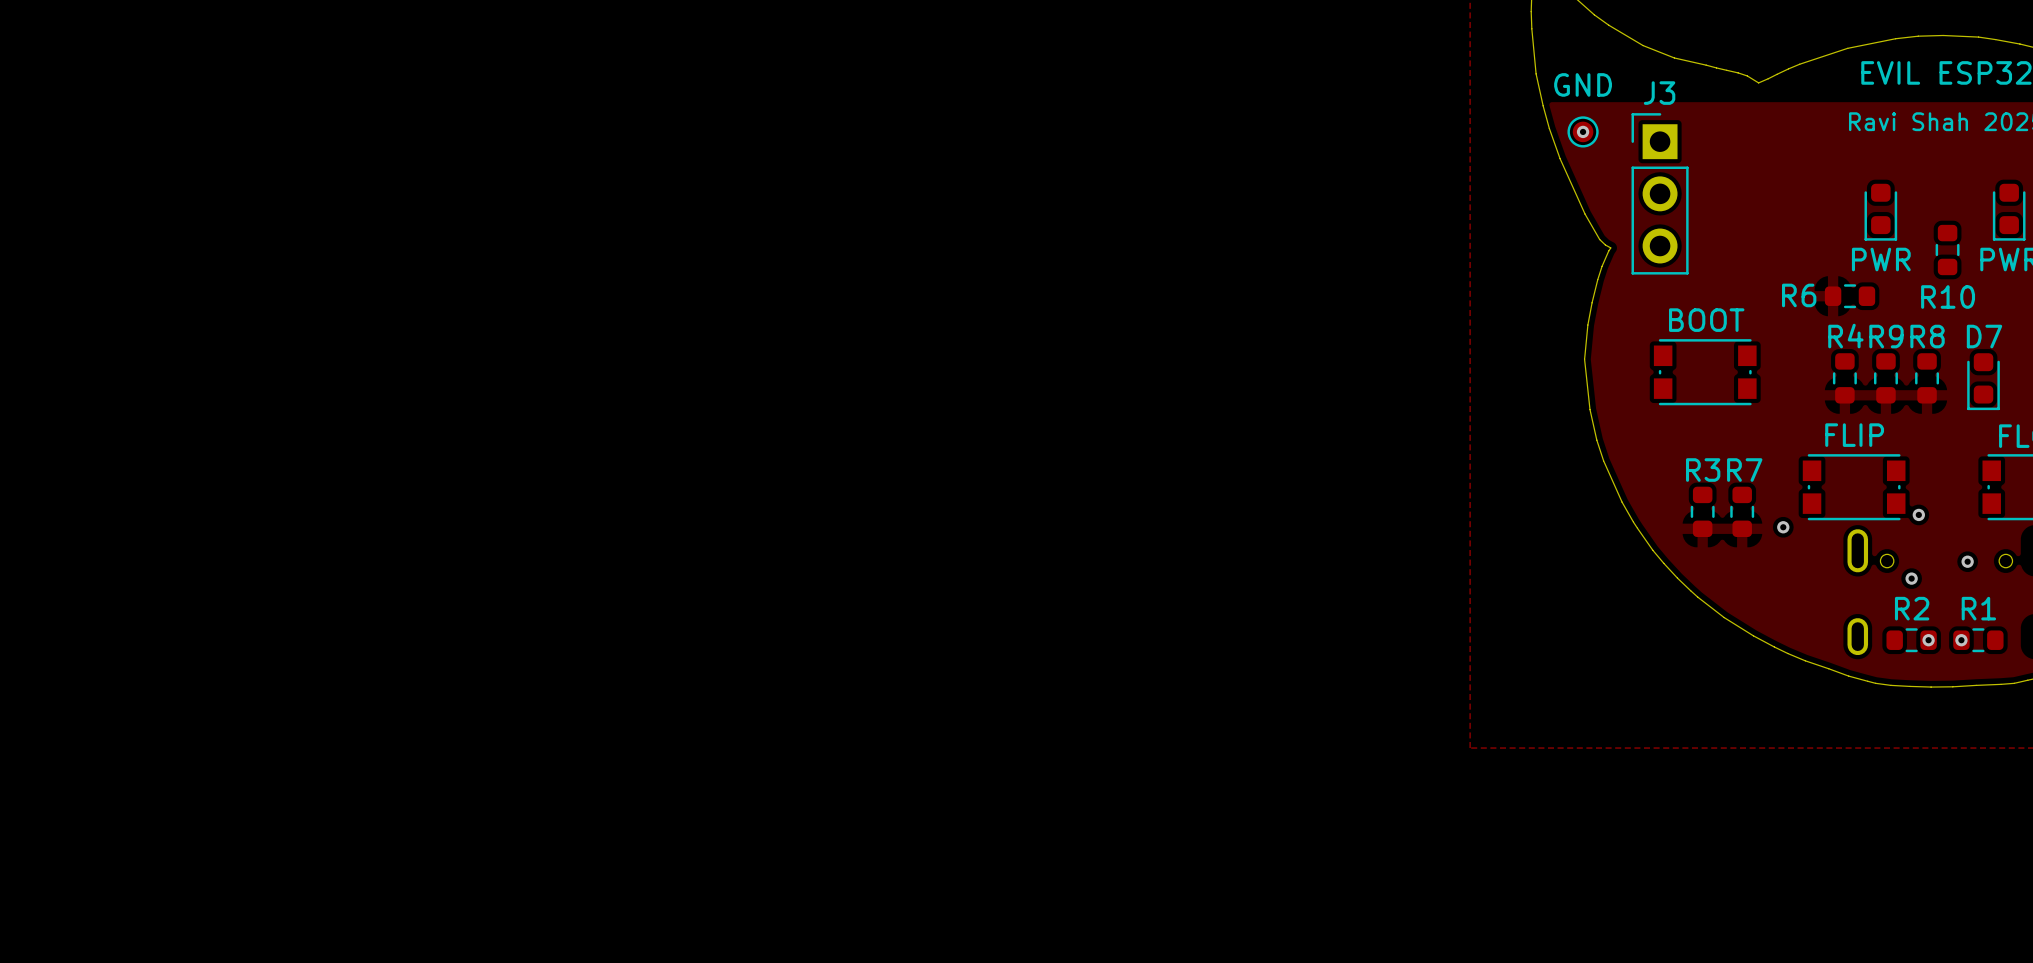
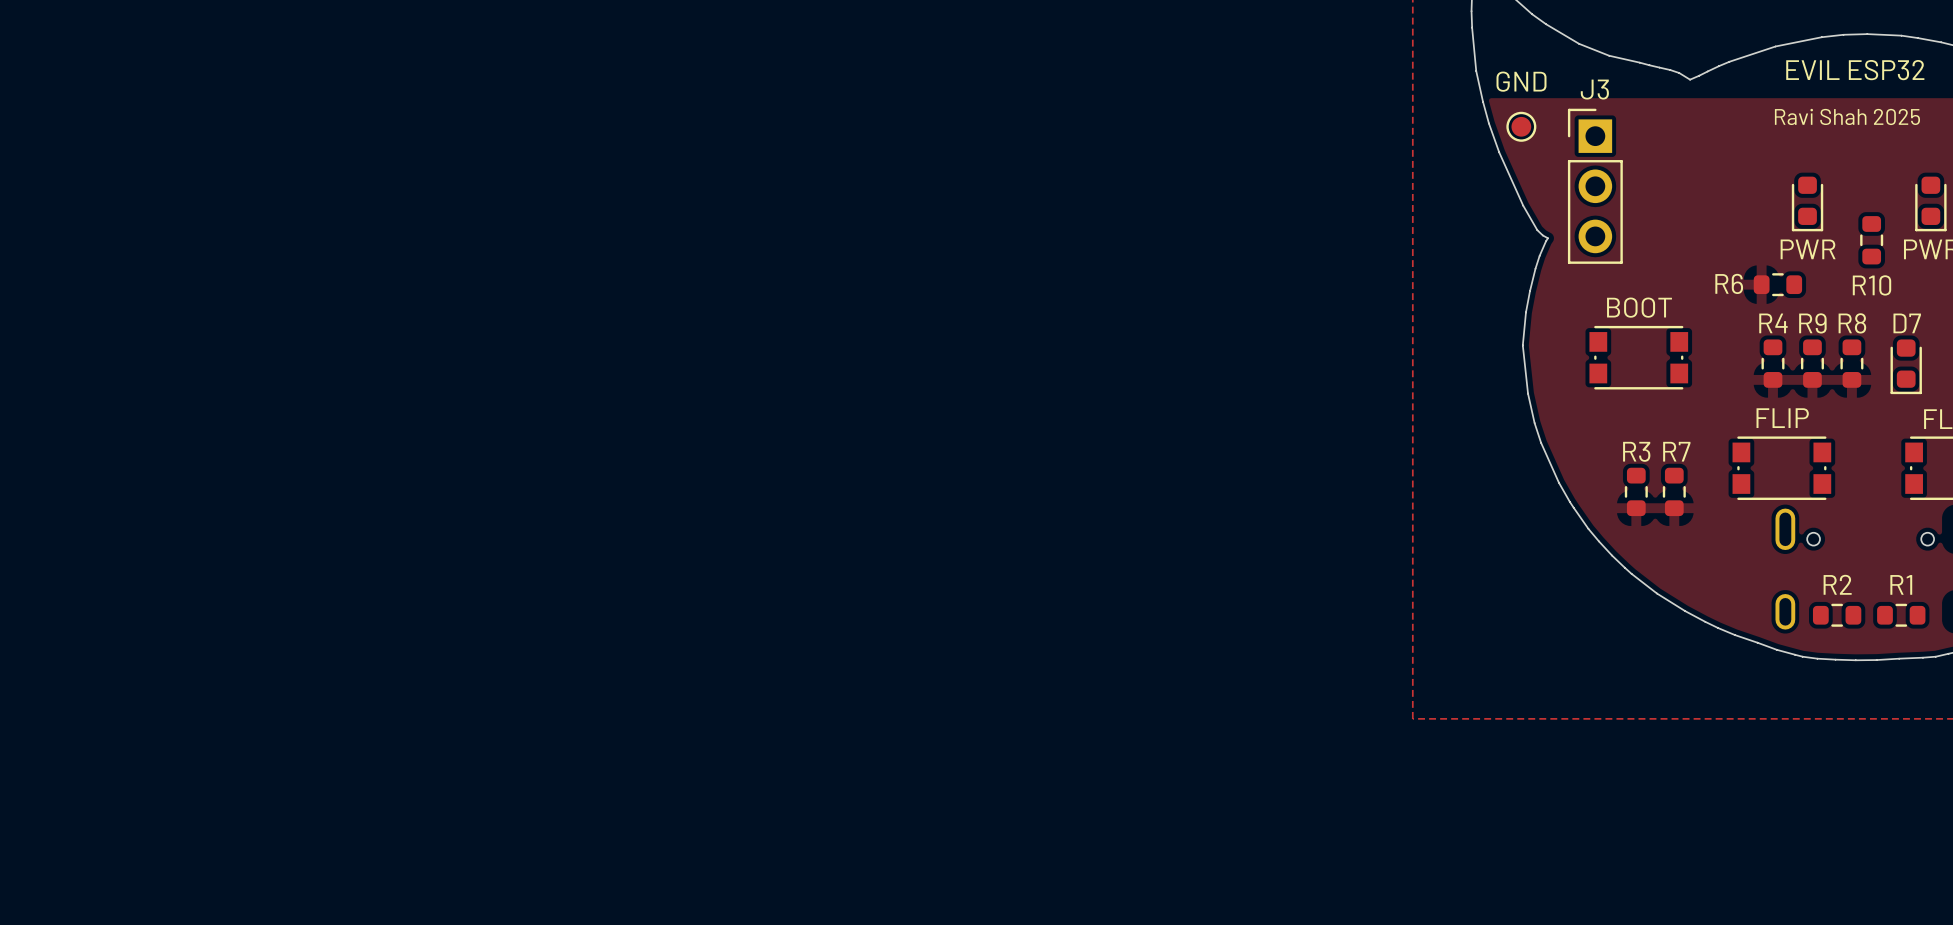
via: (1583, 131) -> none
via: (1918, 514) -> none
via: (1783, 527) -> none
via: (1967, 561) -> none
via: (1911, 578) -> none
via: (1928, 640) -> none
via: (1961, 640) -> none

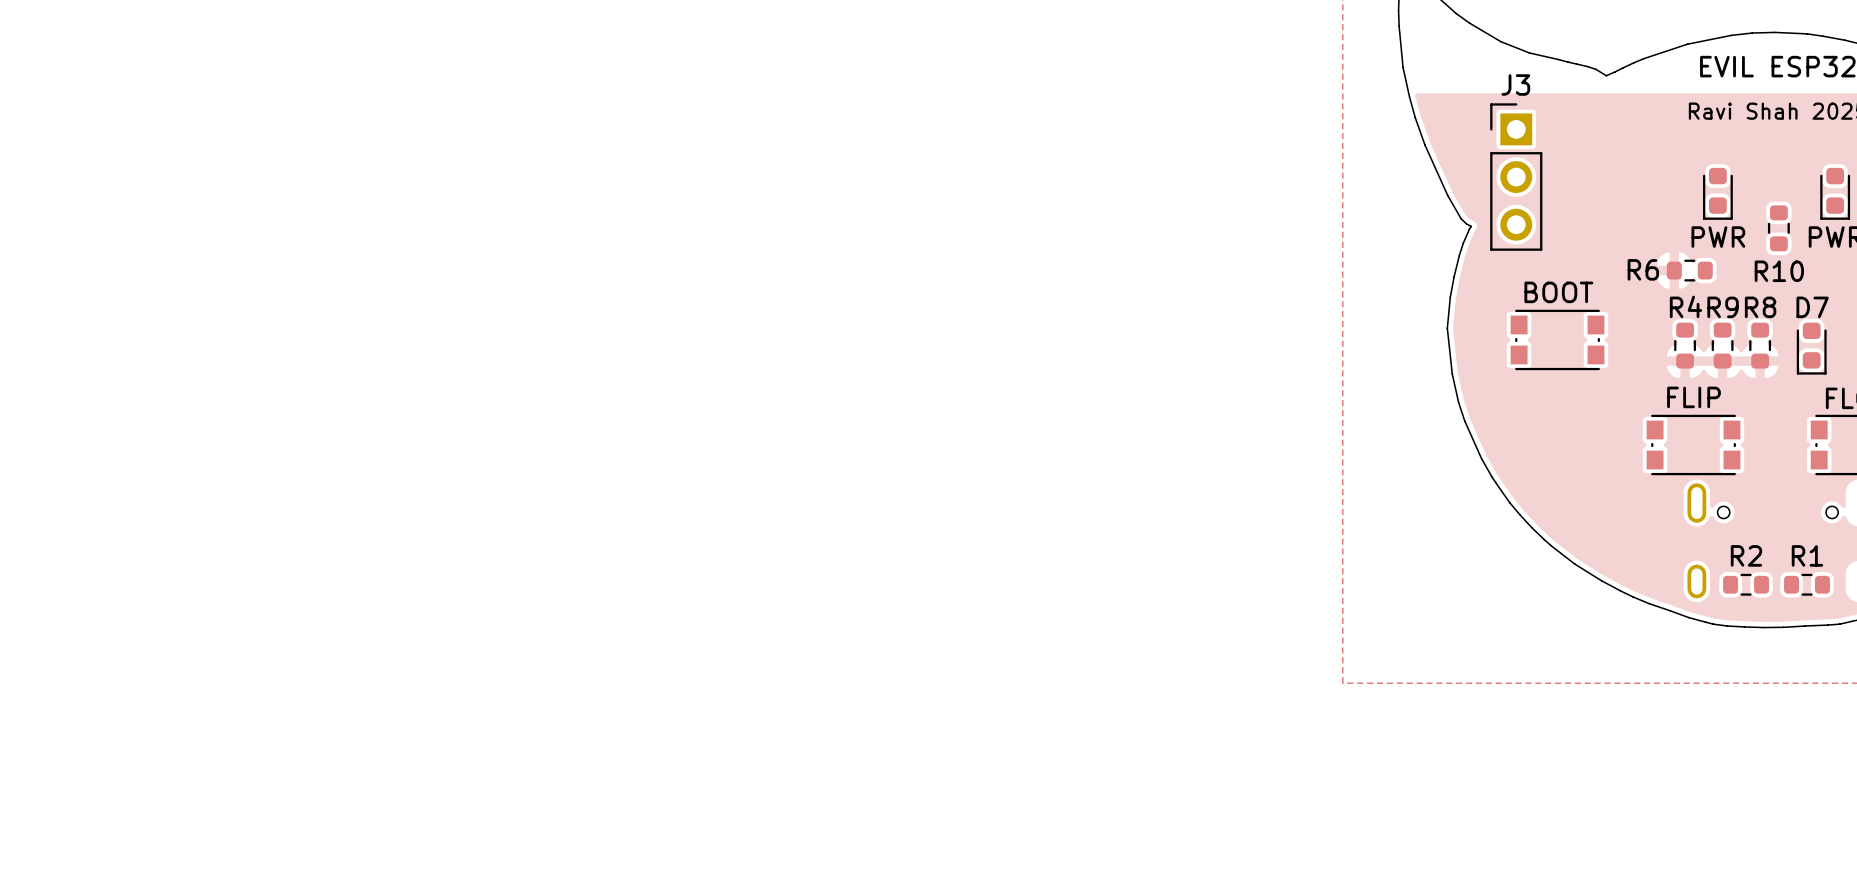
part: GND (1521, 126) -> none
R3: (1636, 491) -> none
R7: (1674, 491) -> none

